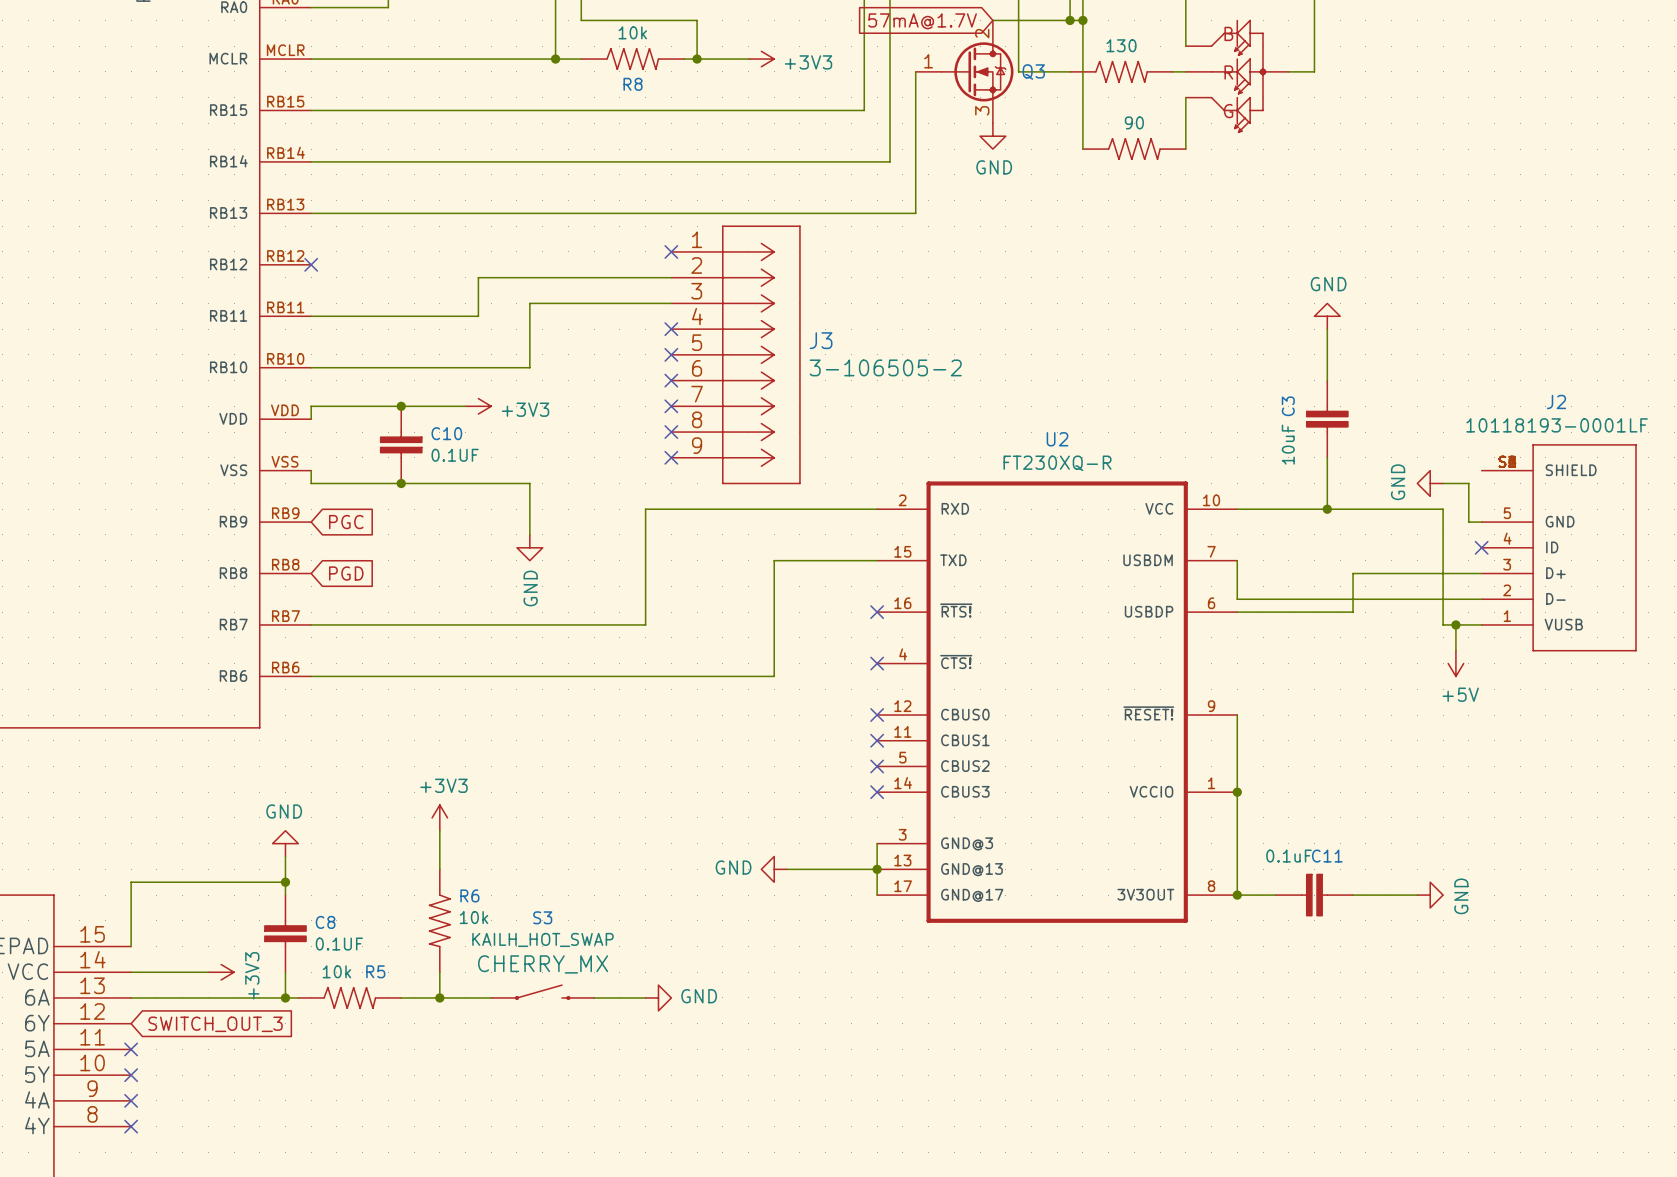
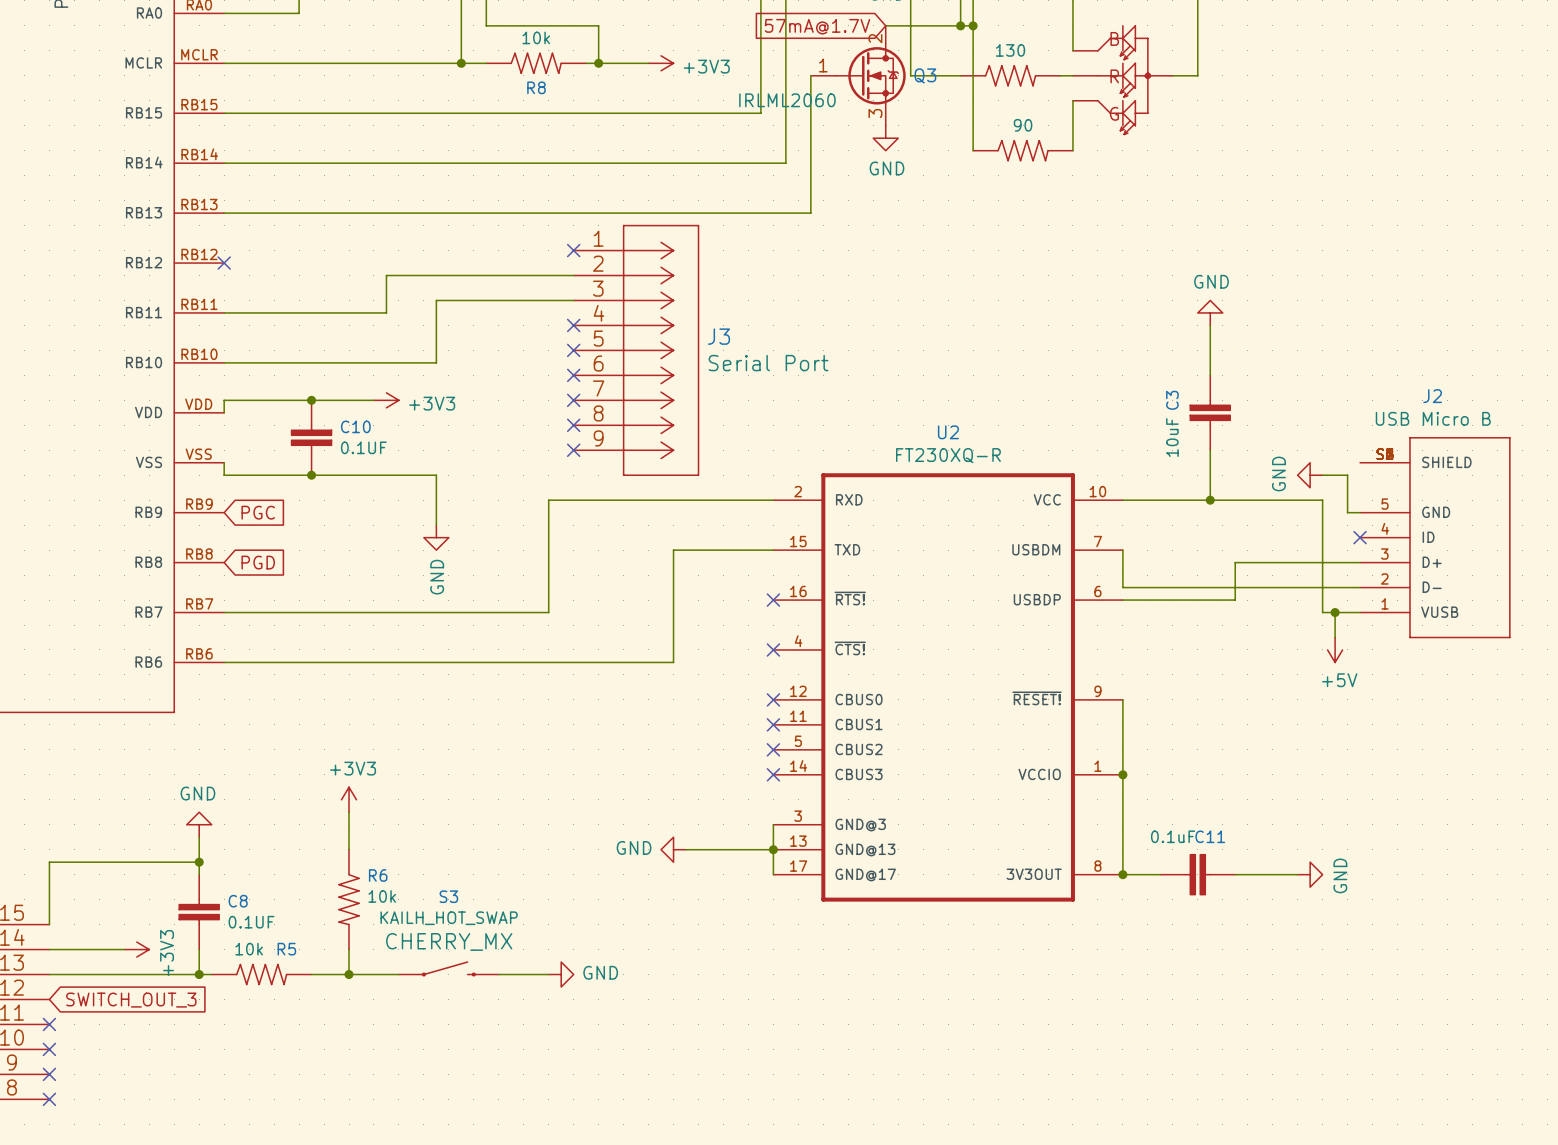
Q3 value: none -> IRLML2060 (787, 100)
J3 value: 3-106505-2 (885, 367) -> Serial Port (768, 363)
J2 value: 10118193-0001LF (1557, 425) -> USB Micro B (1433, 418)

